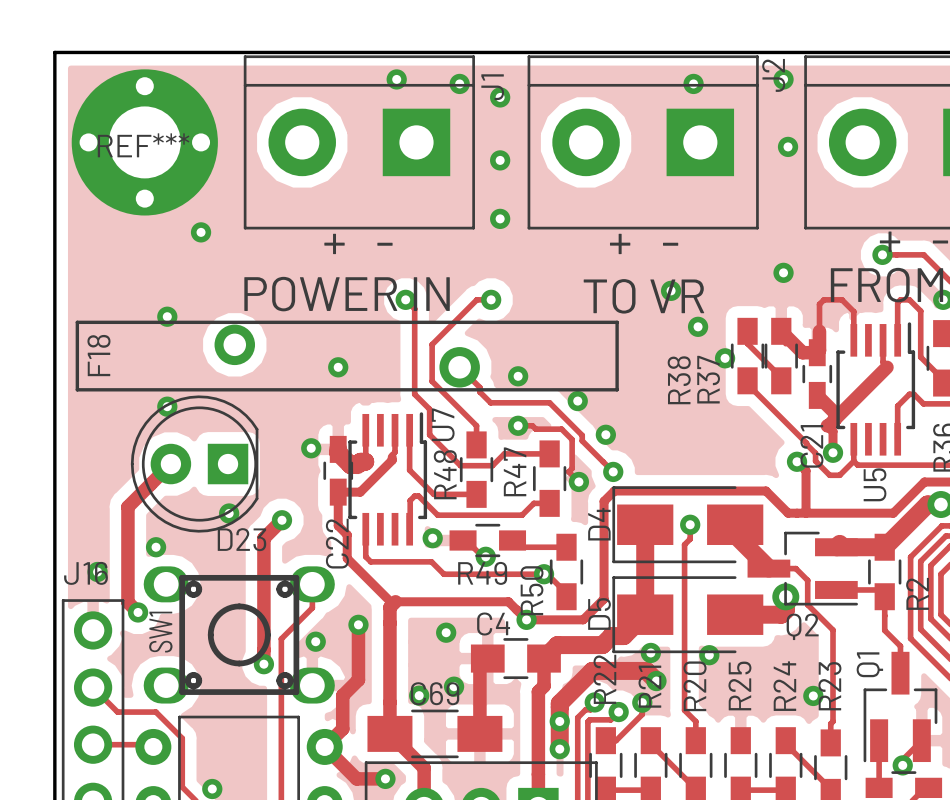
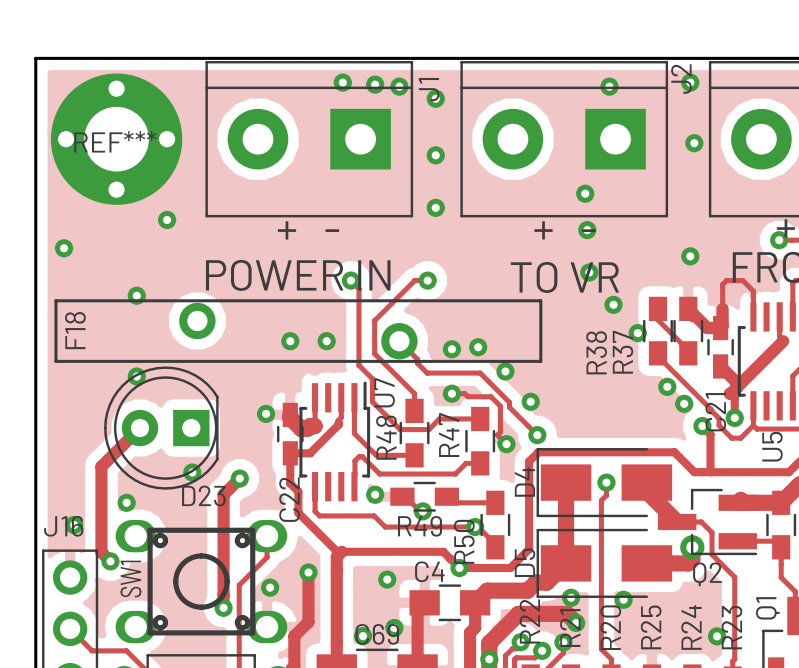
via: none -> (375, 84)
via: none -> (585, 193)
via: none -> (587, 230)
via: none -> (64, 248)
via: none -> (326, 341)
via: none -> (478, 347)
via: none -> (667, 386)
via: none -> (684, 403)

